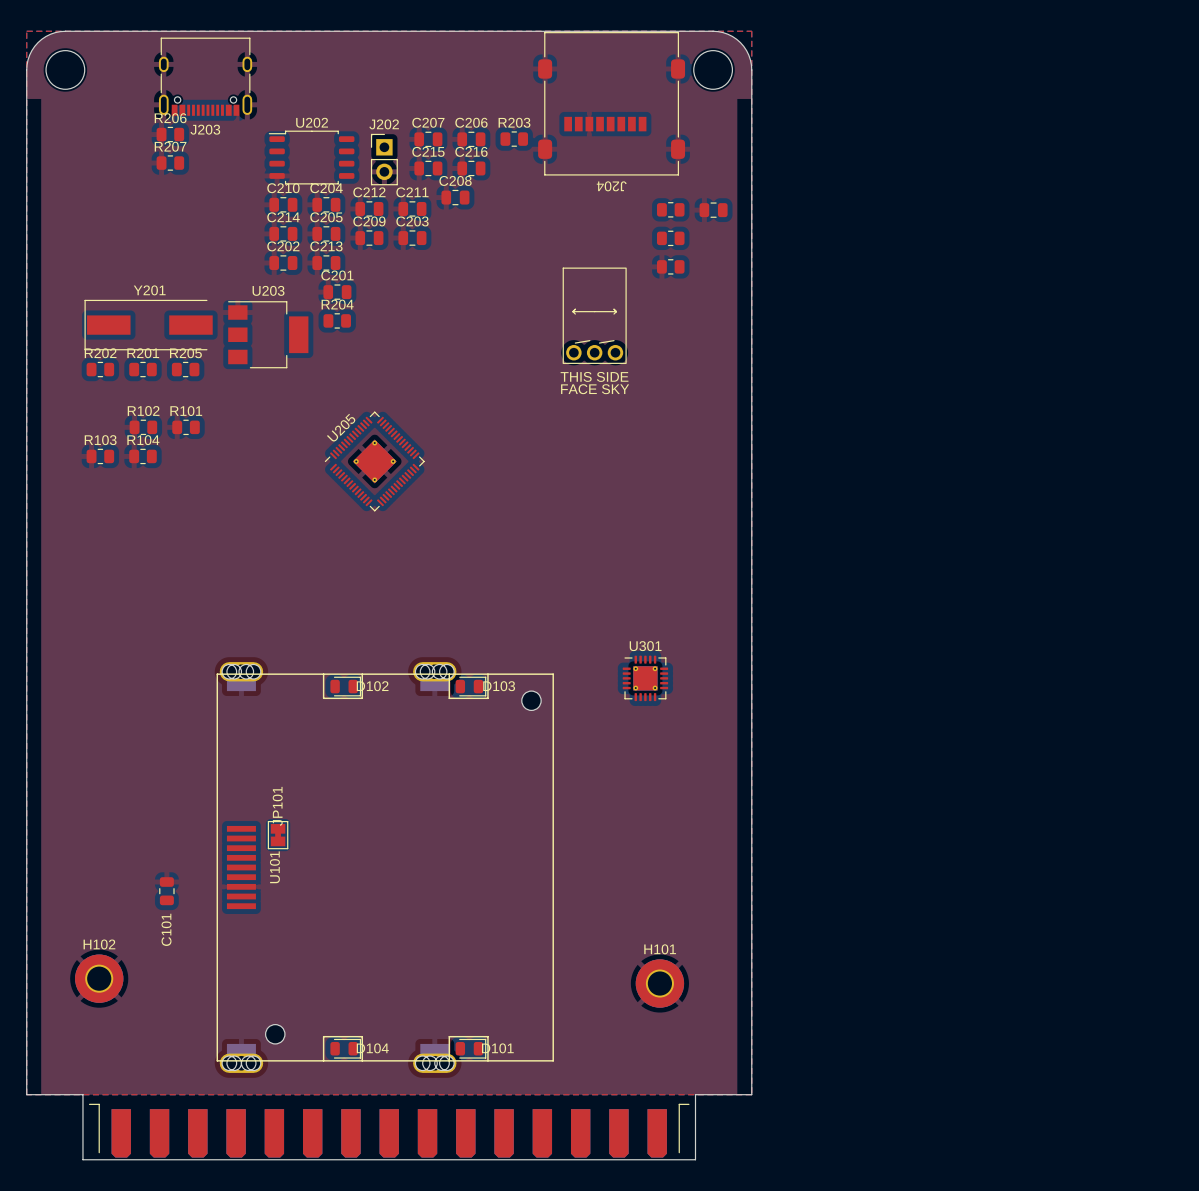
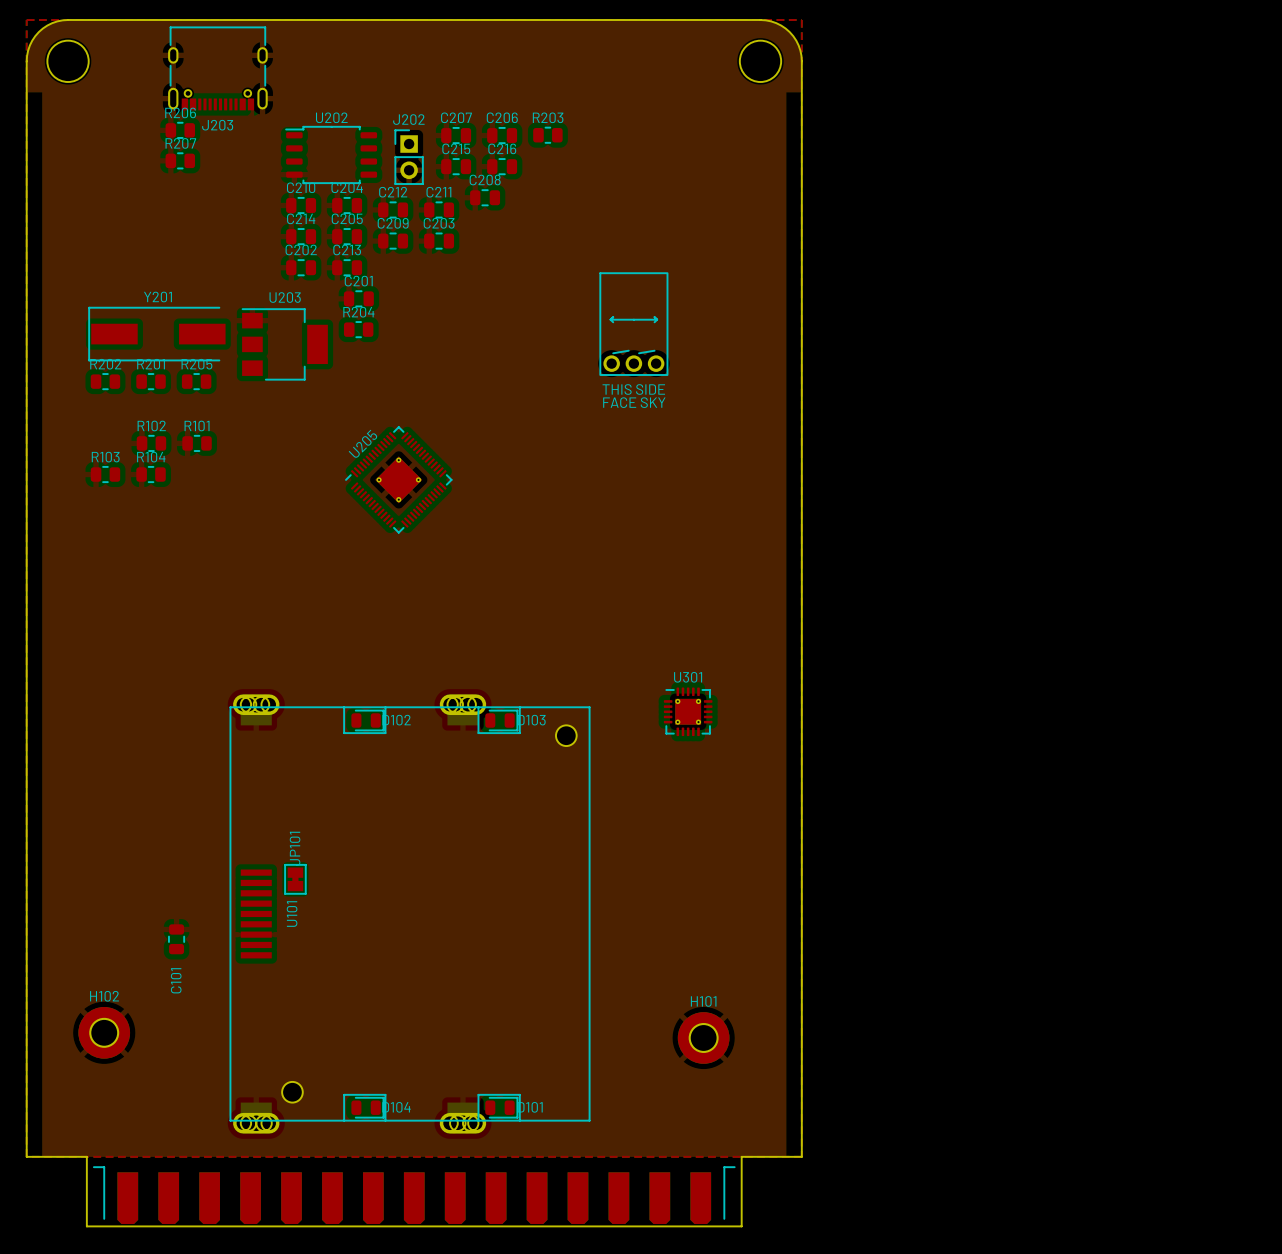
J204: (611, 103) -> none
part: (670, 209) -> none
part: (713, 210) -> none
part: (670, 238) -> none
part: (670, 266) -> none

